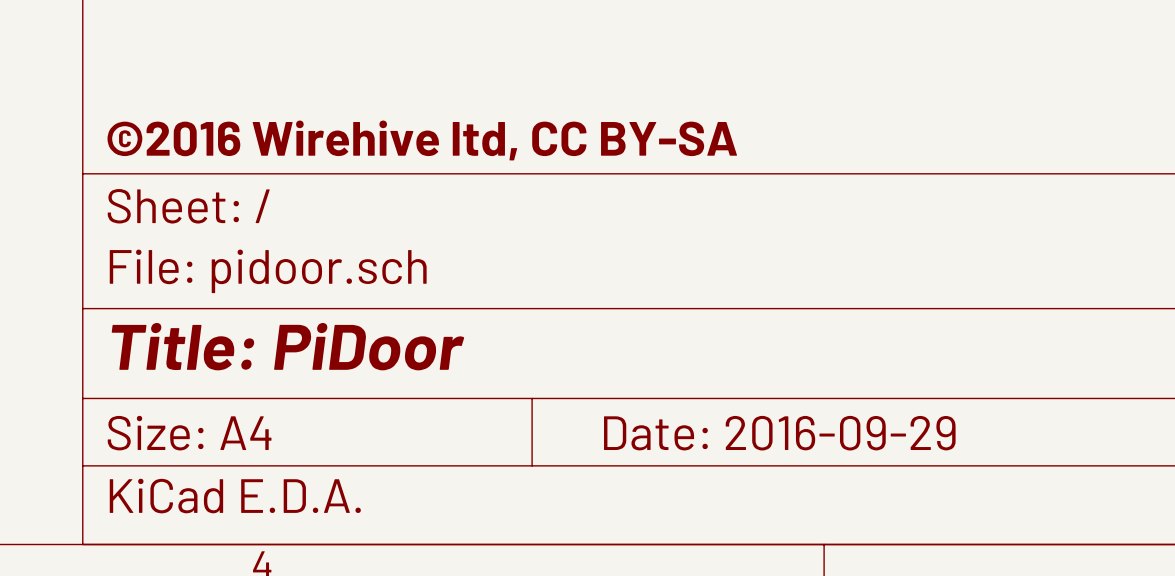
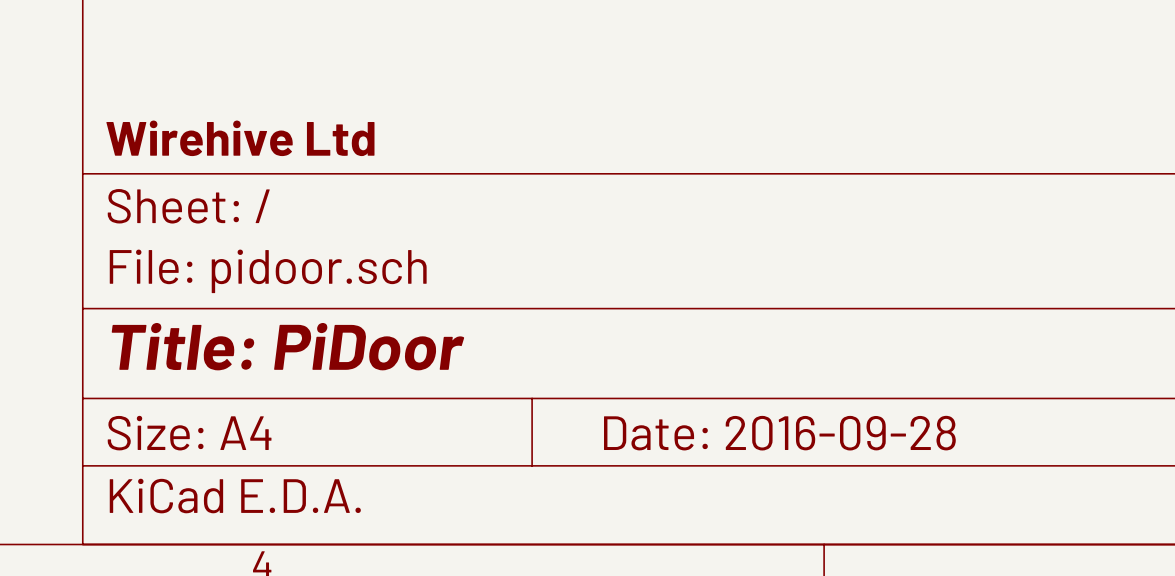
title block: ©2016 Wirehive ltd, CC BY-SA (422, 140) -> Wirehive Ltd (240, 138)
title block: Date: 2016-09-29 (779, 433) -> Date: 2016-09-28 (779, 433)

